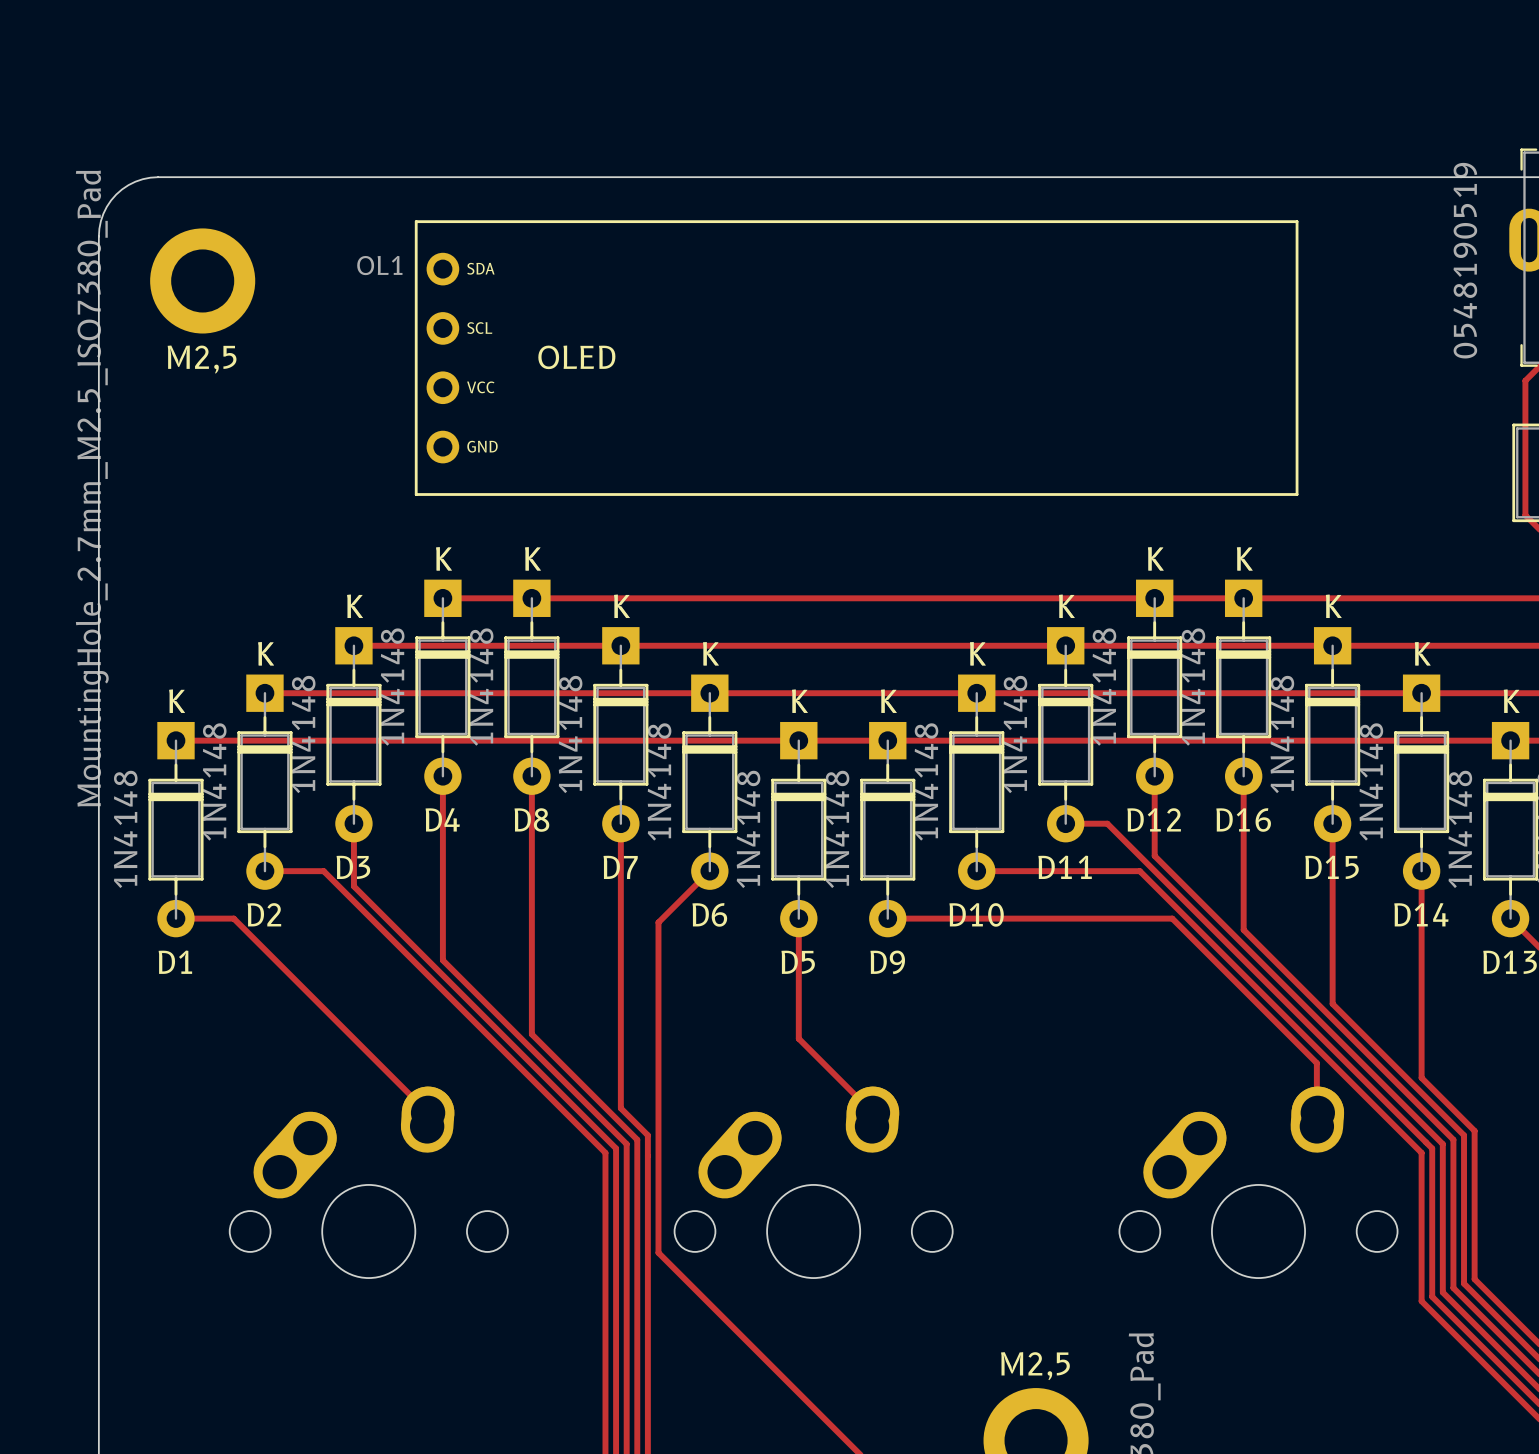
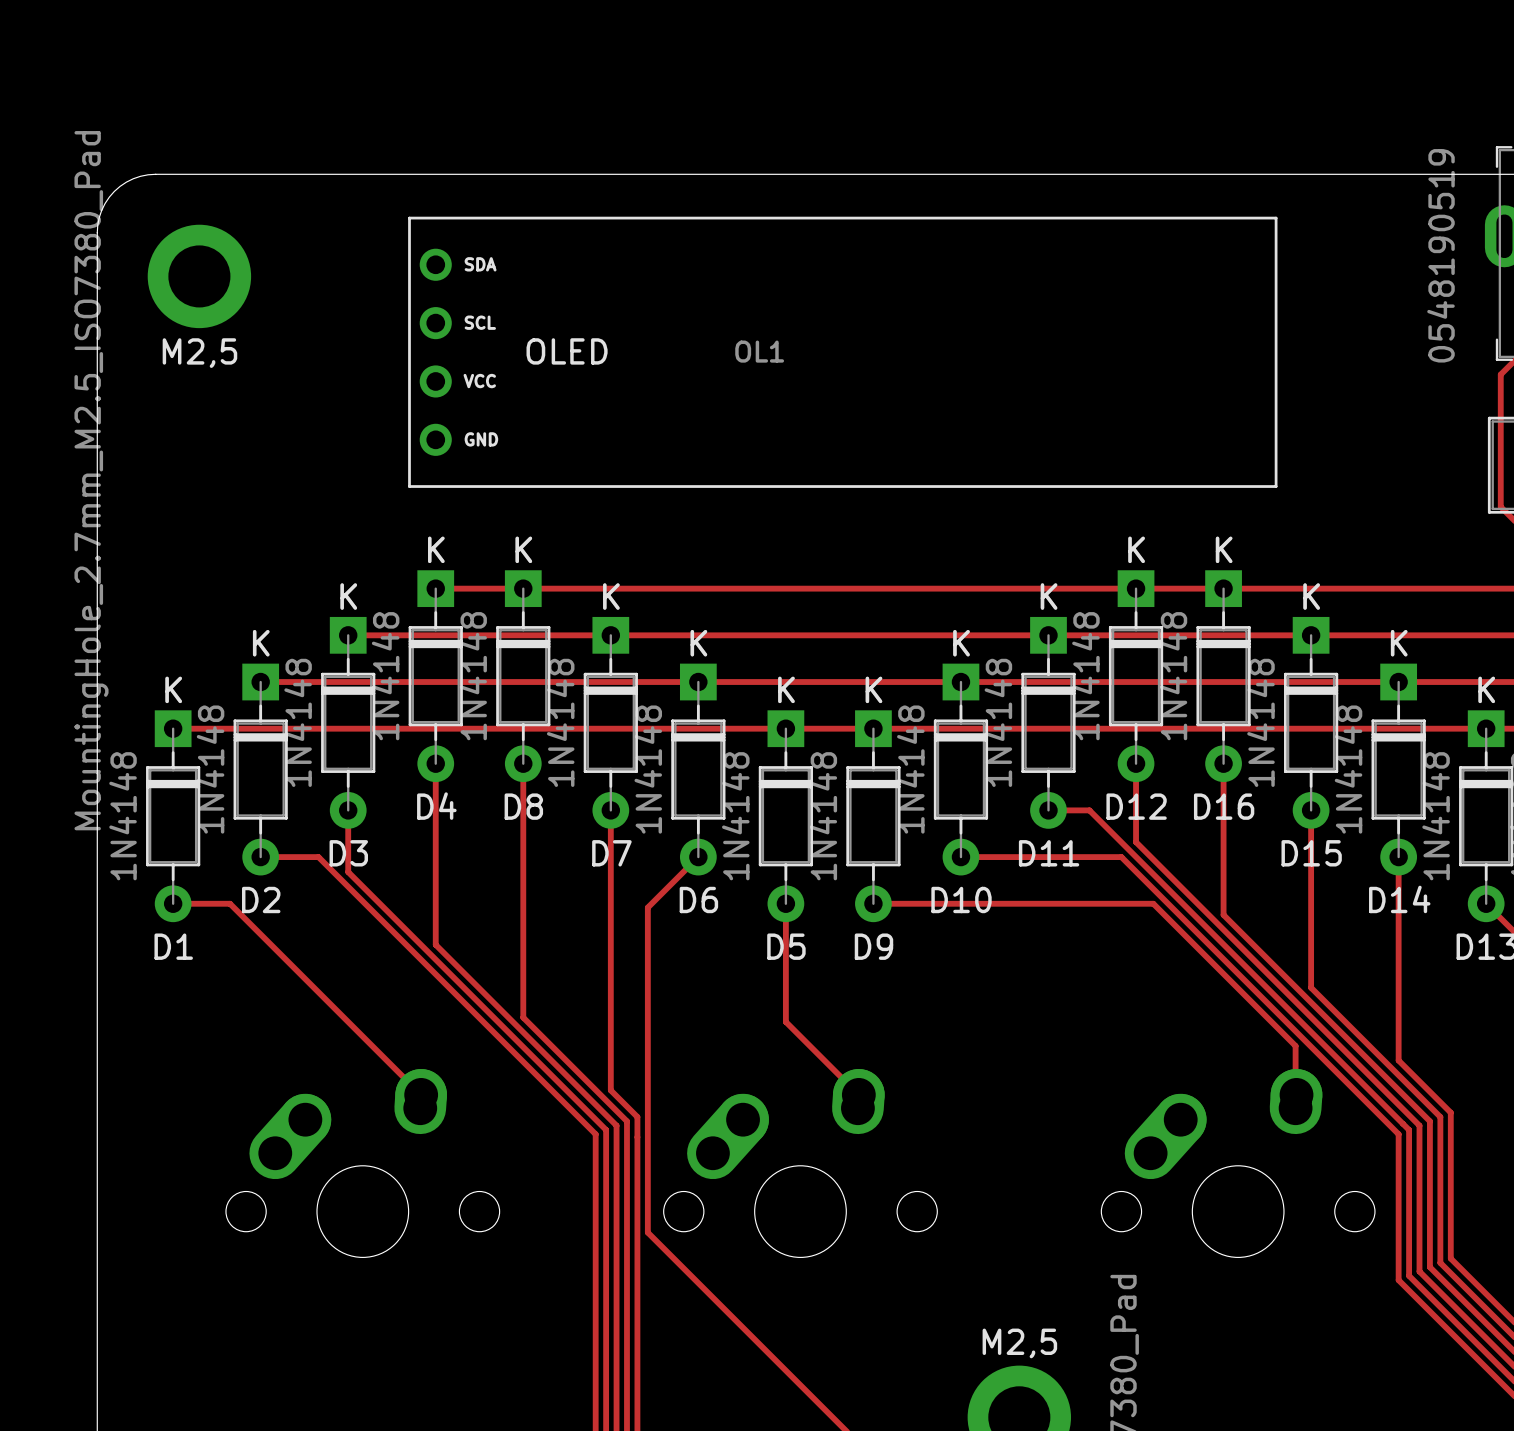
OL1 footprint: [426, 252, 460, 464] -> [408, 216, 1278, 488]
OL1 name position: OL1 (379, 265) -> OL1 (759, 351)
text: SDA (480, 268) -> none
text: SCL (479, 328) -> none
text: VCC (480, 387) -> none
text: GND (482, 446) -> none

